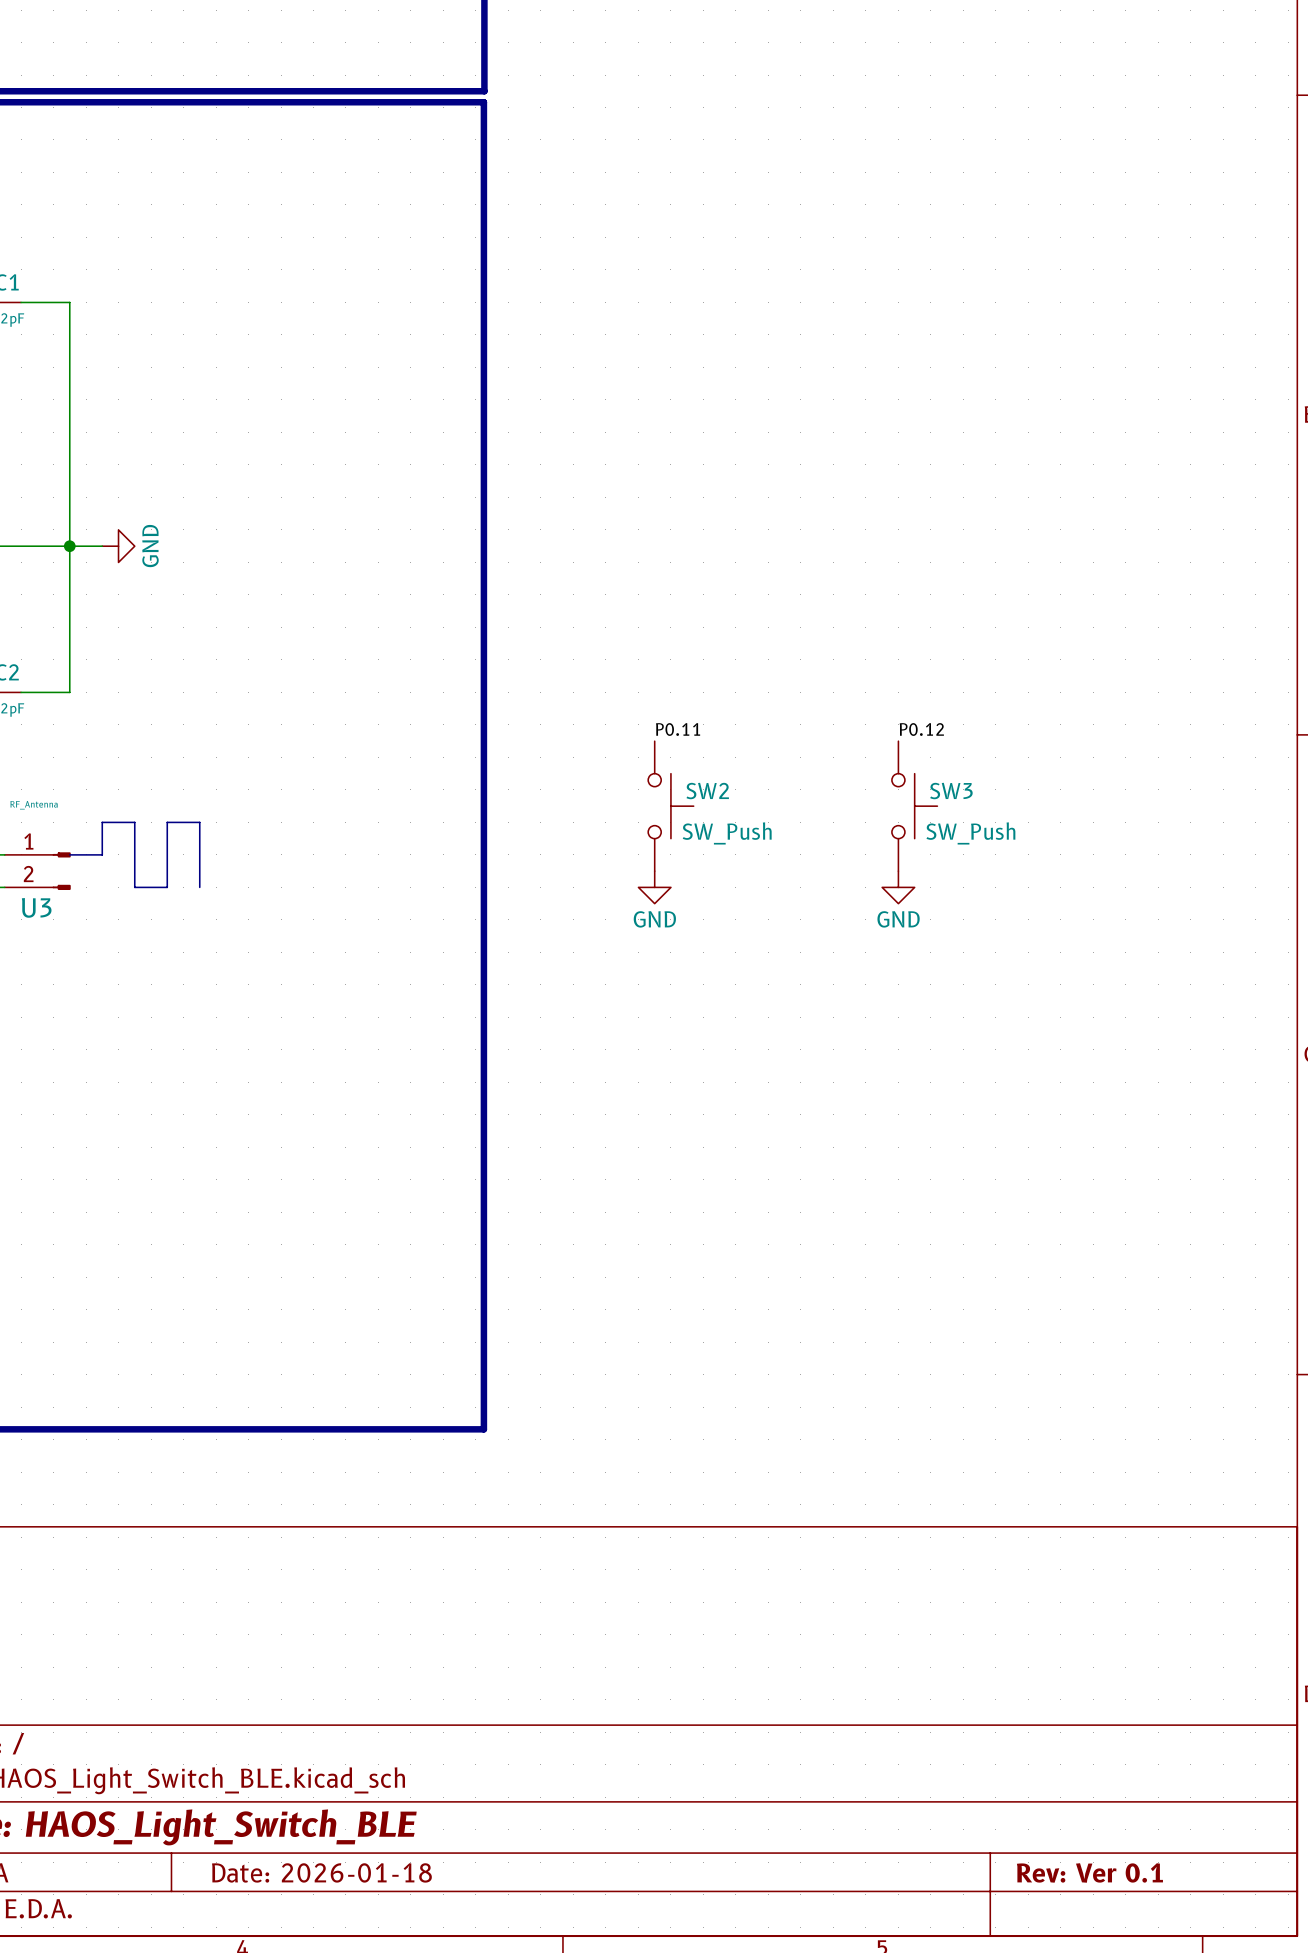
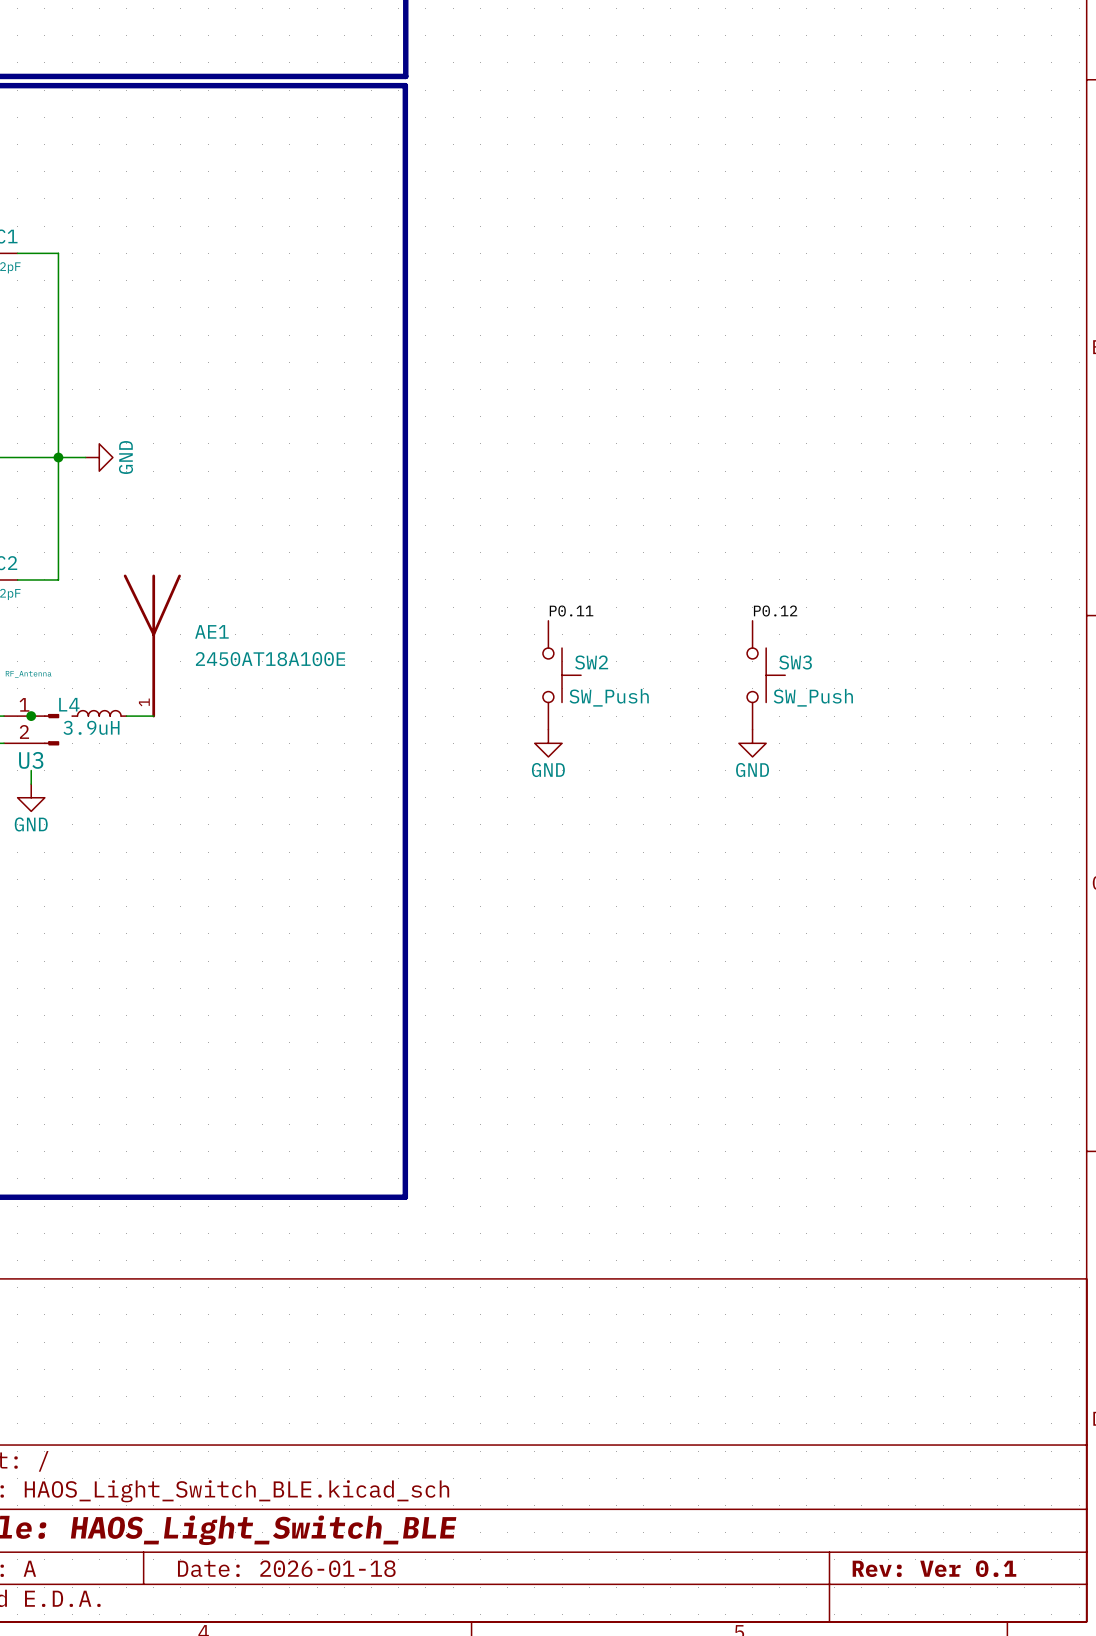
AE1: none -> 2450AT18A100E (152, 646)
L4: none -> 3.9uH (99, 713)
junction: none -> (31, 716)
bus: (69, 854) (102, 854) (102, 822) (134, 822) (134, 887) (167, 887) (167, 822) (199, 822) (199, 887) -> none
wire: none -> (126, 716) (153, 716)
wire: none -> (31, 770) (31, 784)
power symbol: none -> GND (31, 797)

